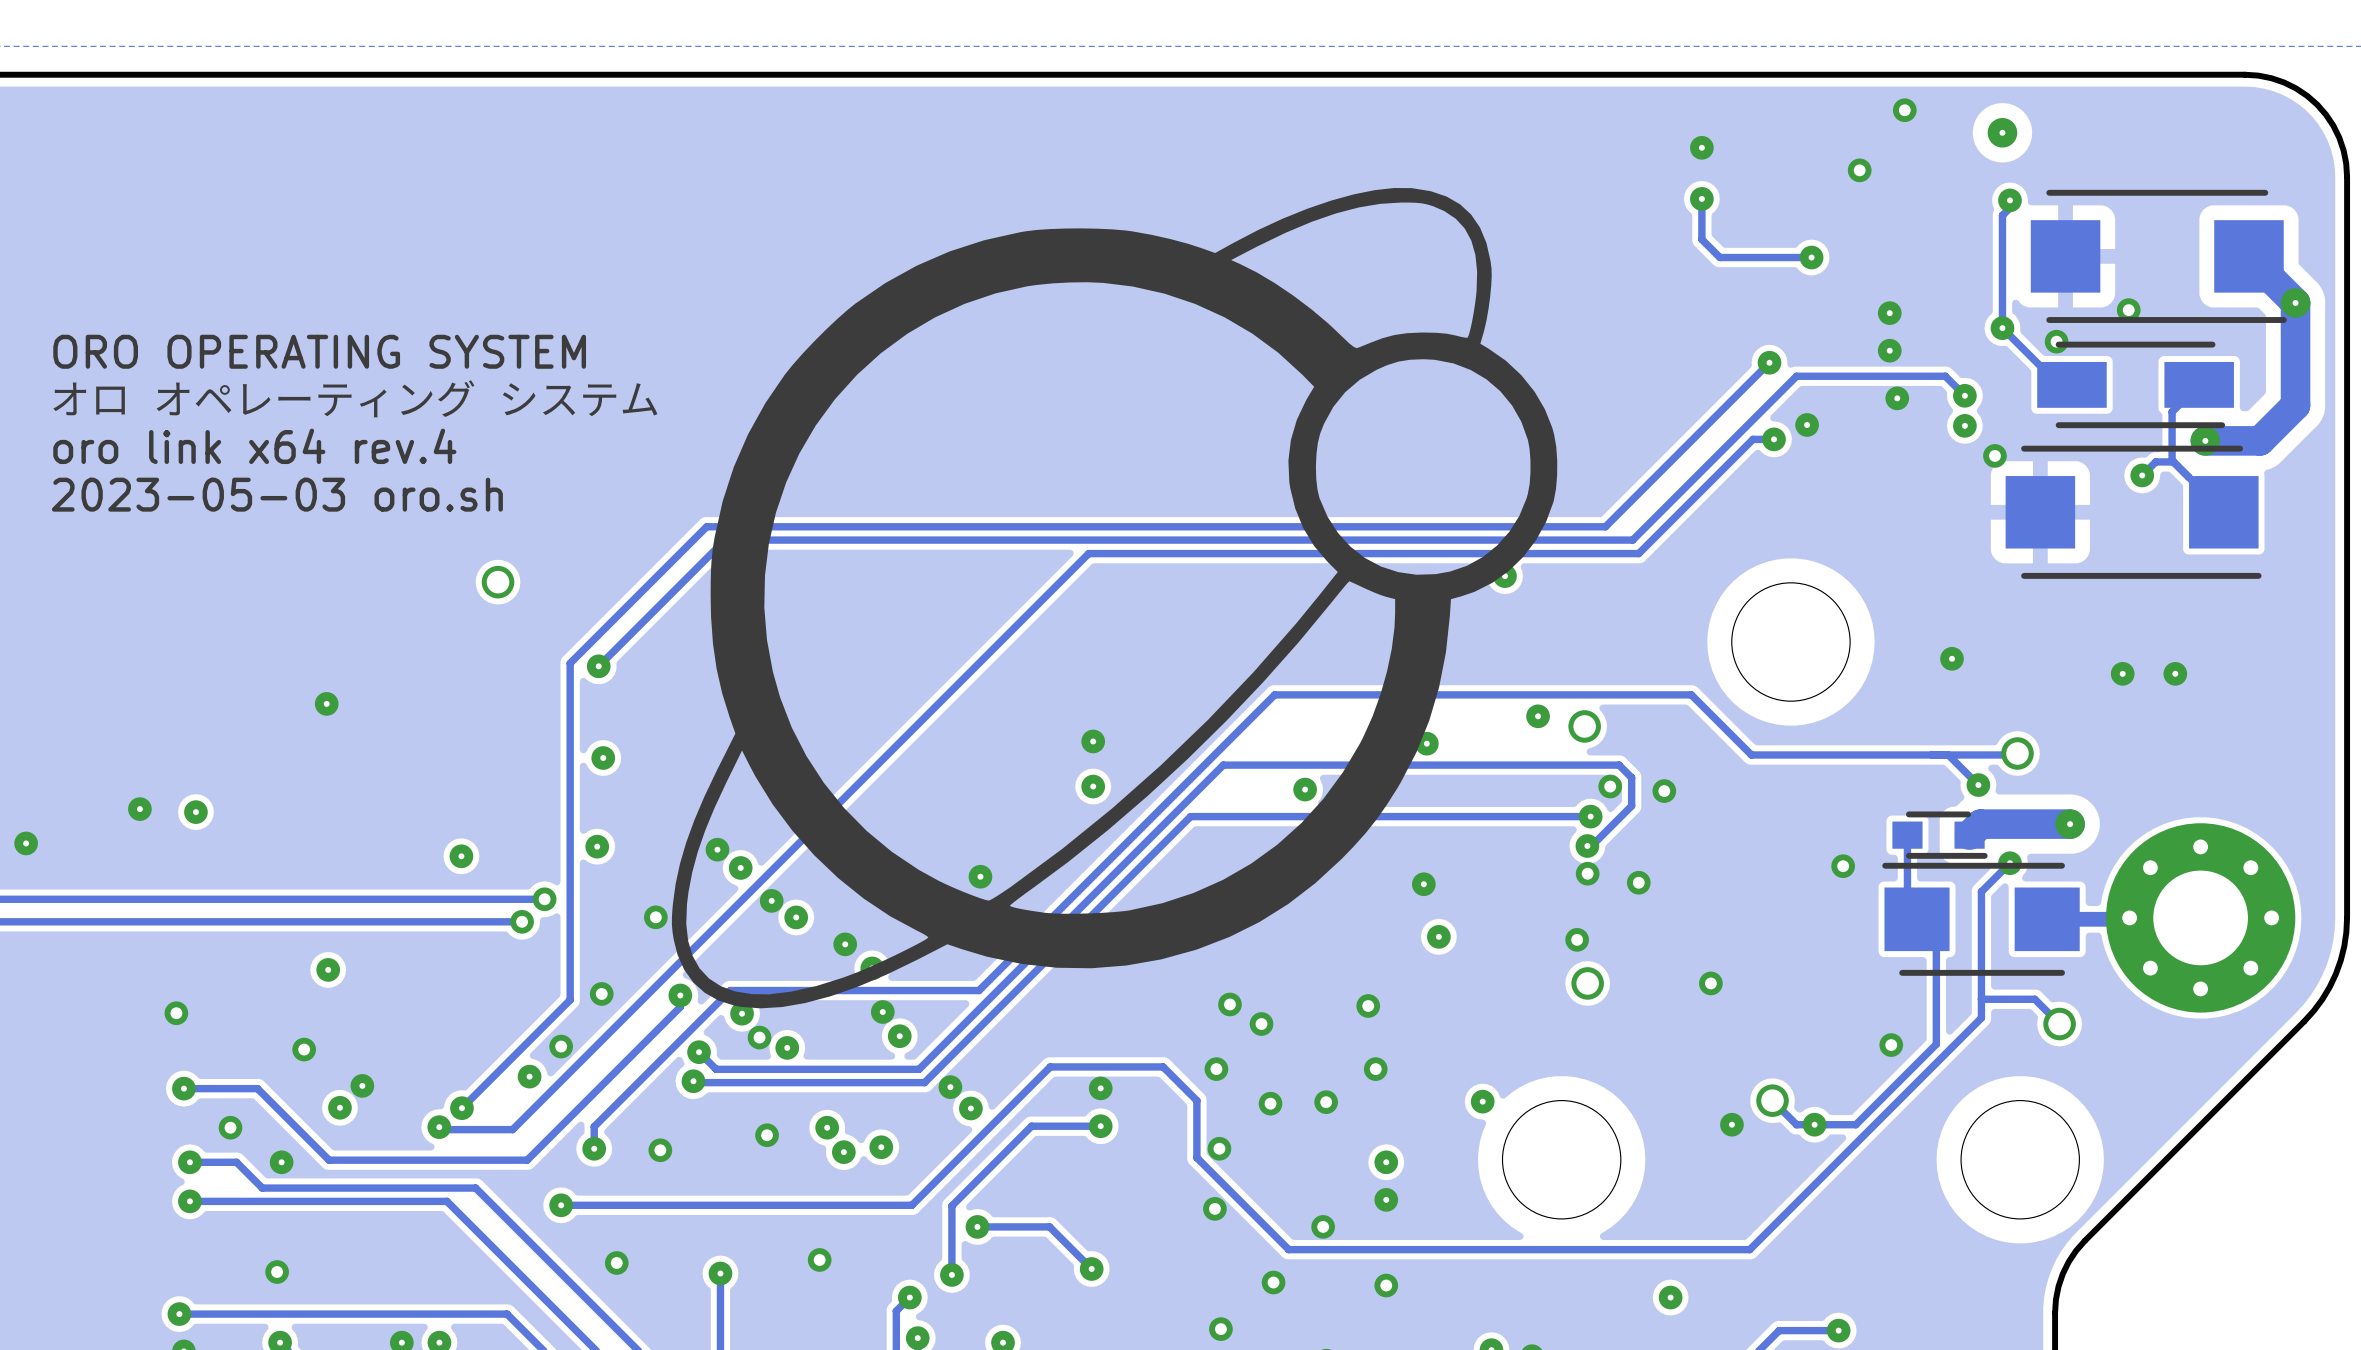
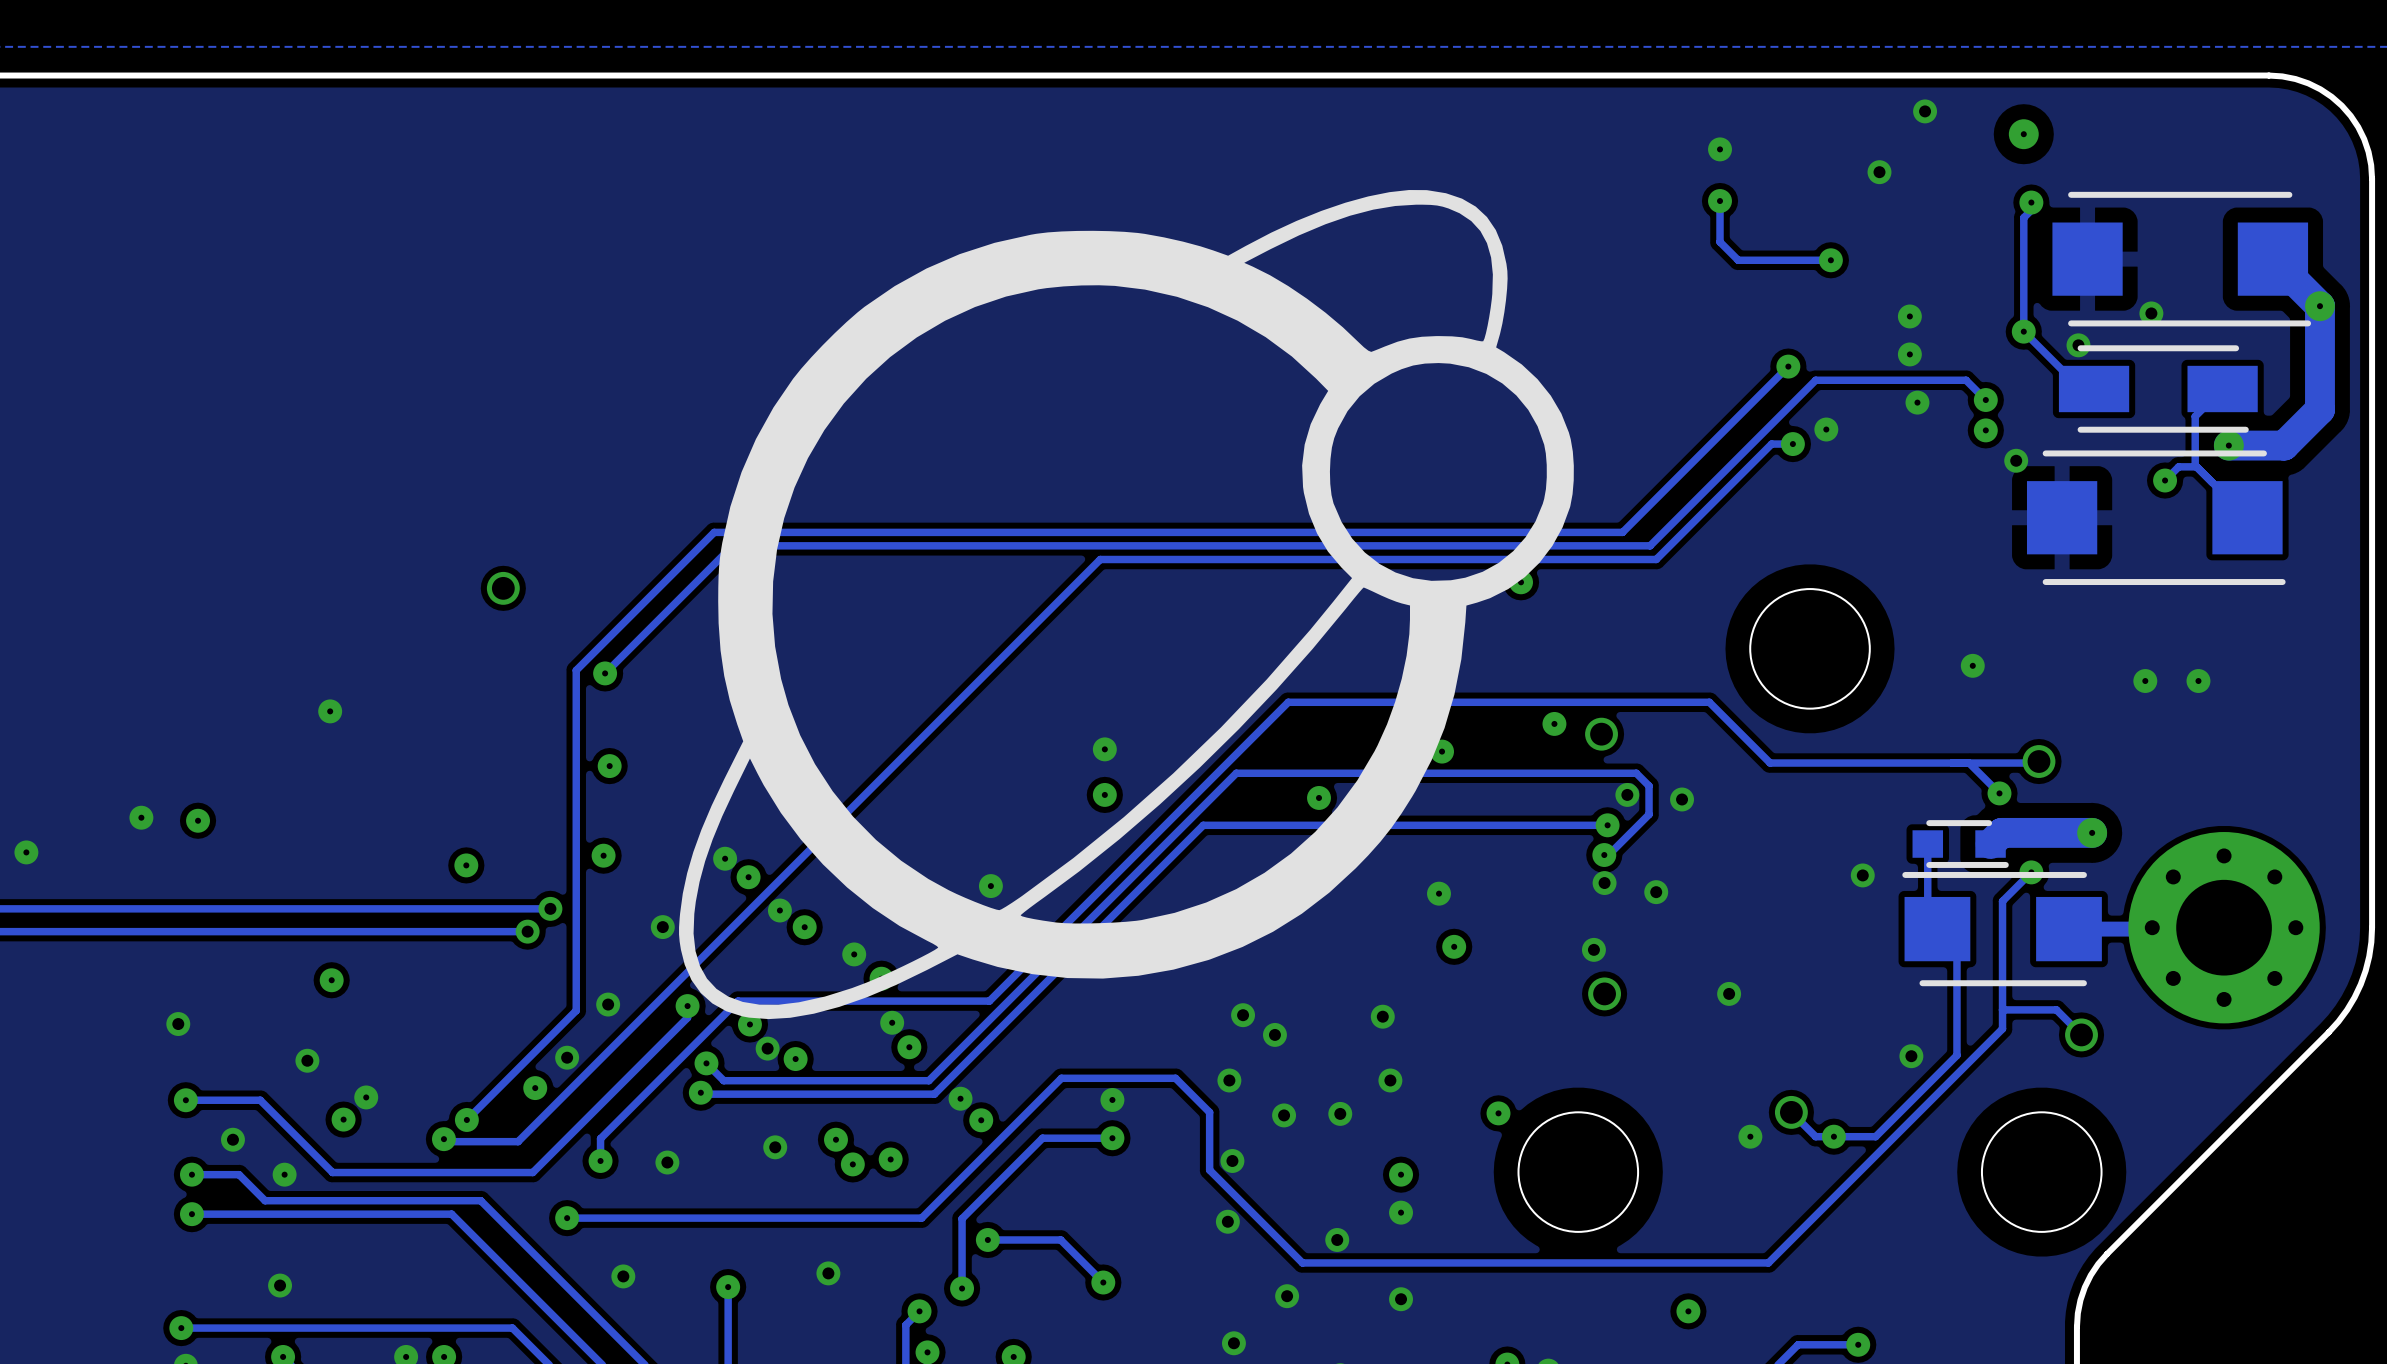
text: ORO OPERATING SYSTEM (319, 351) -> none
text: オロ オペレーティング システム (355, 398) -> none
text: oro link x64 rev.4 (254, 446) -> none
text: 2023-05-03 oro.sh (277, 494) -> none

